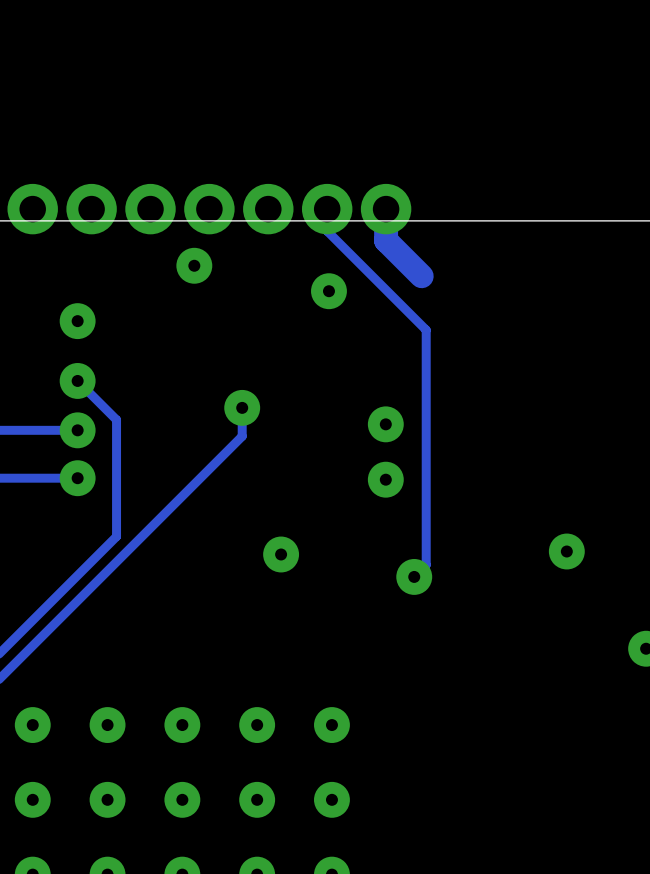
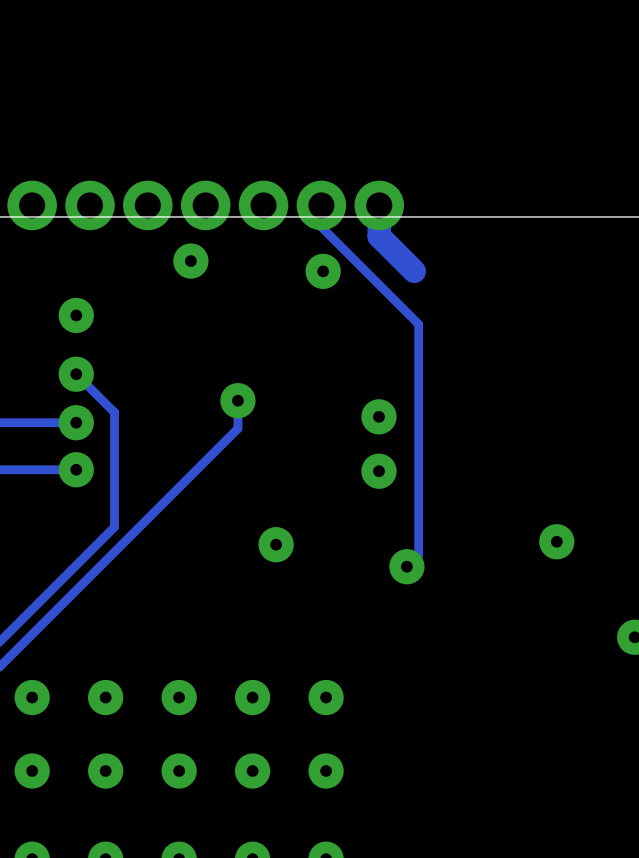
via position: (328, 291) -> (323, 271)
via position: (32, 725) -> (32, 697)
via position: (107, 725) -> (105, 697)
via position: (182, 725) -> (179, 697)
via position: (257, 725) -> (252, 697)
via position: (331, 725) -> (326, 697)
via position: (32, 799) -> (32, 771)
via position: (107, 799) -> (105, 771)
via position: (182, 799) -> (179, 771)
via position: (257, 799) -> (252, 771)
via position: (331, 799) -> (326, 771)

